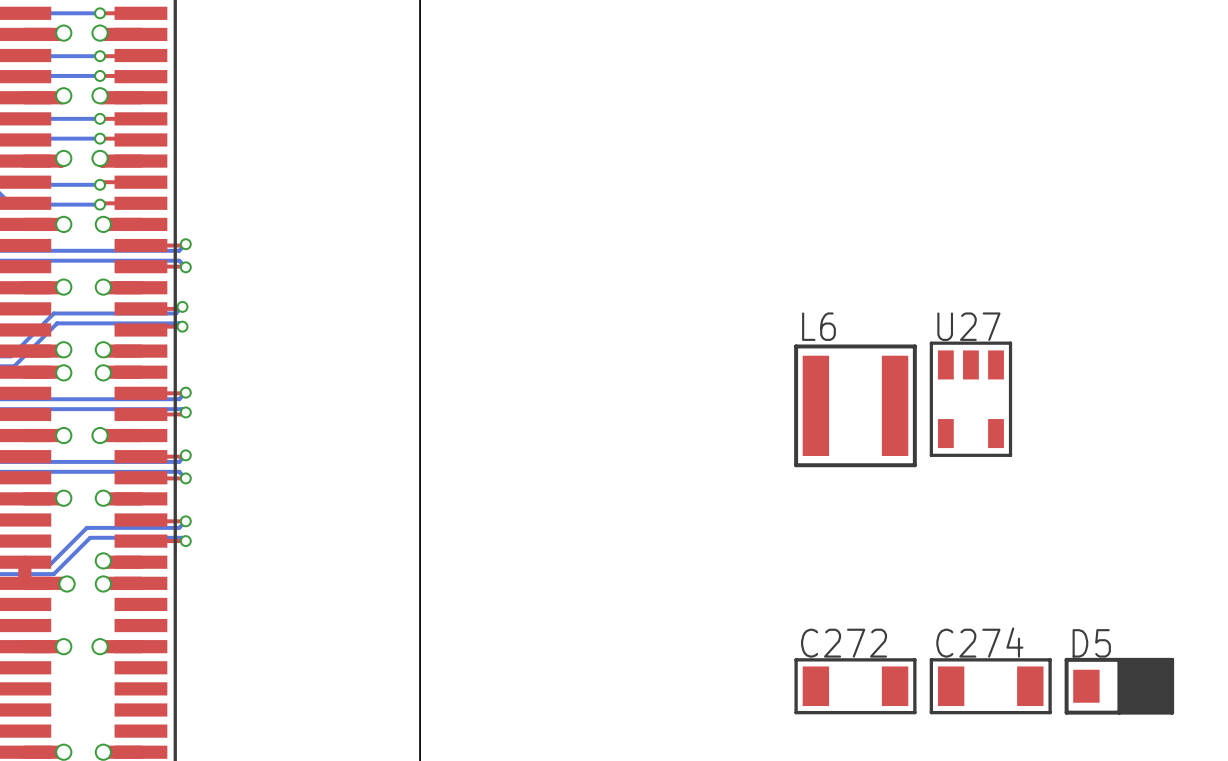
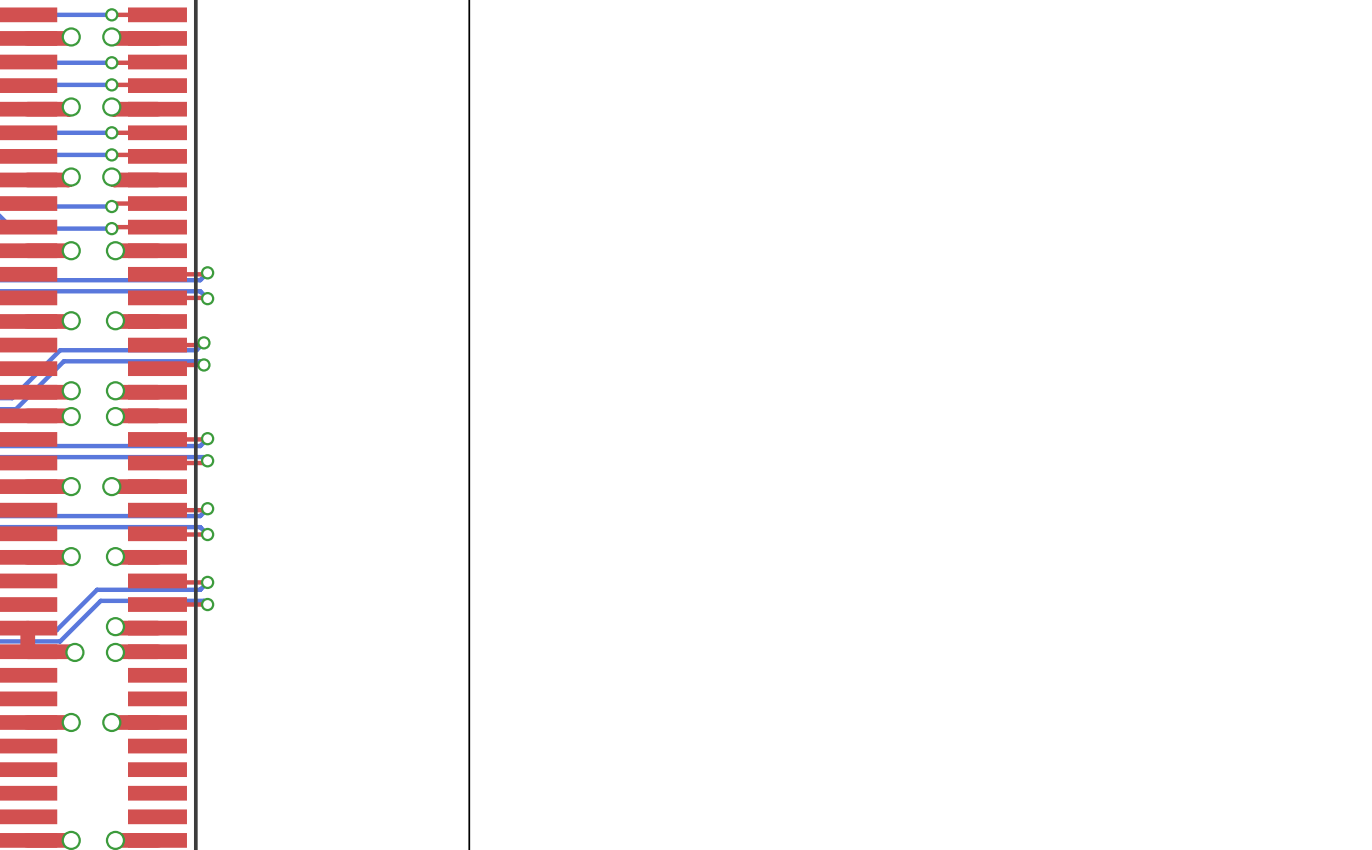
U27: (970, 399) -> none
L6: (855, 405) -> none
C272: (855, 686) -> none
C274: (990, 686) -> none
D5: (1119, 686) -> none

